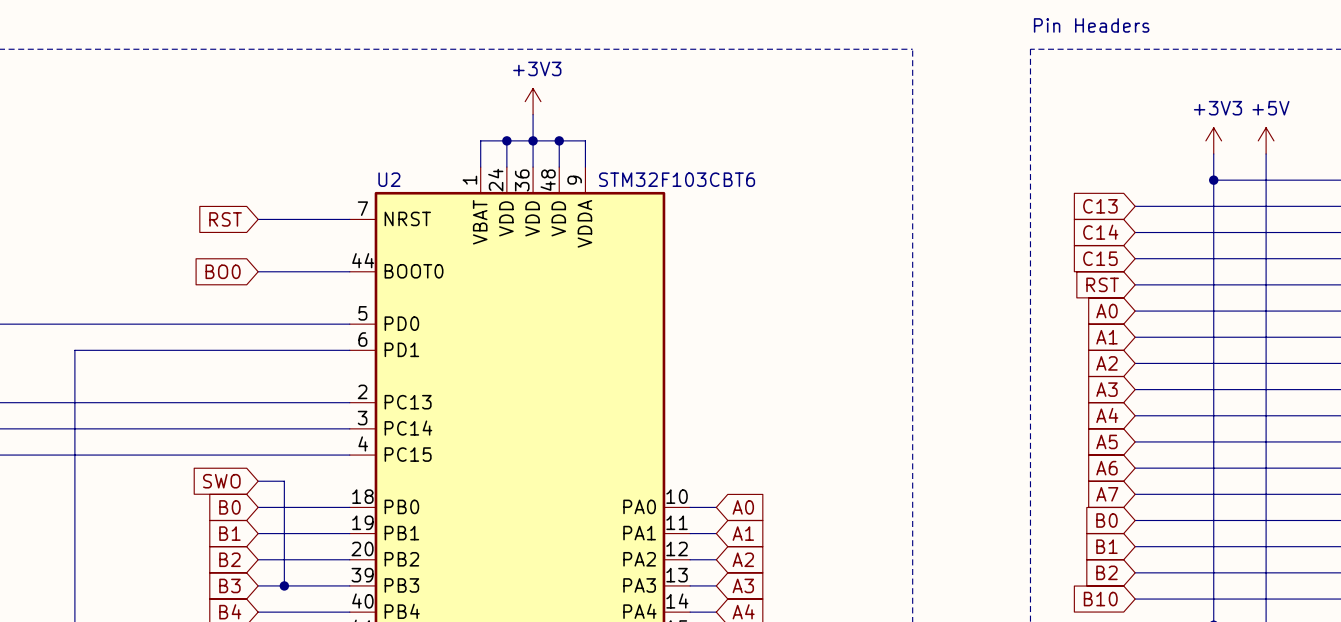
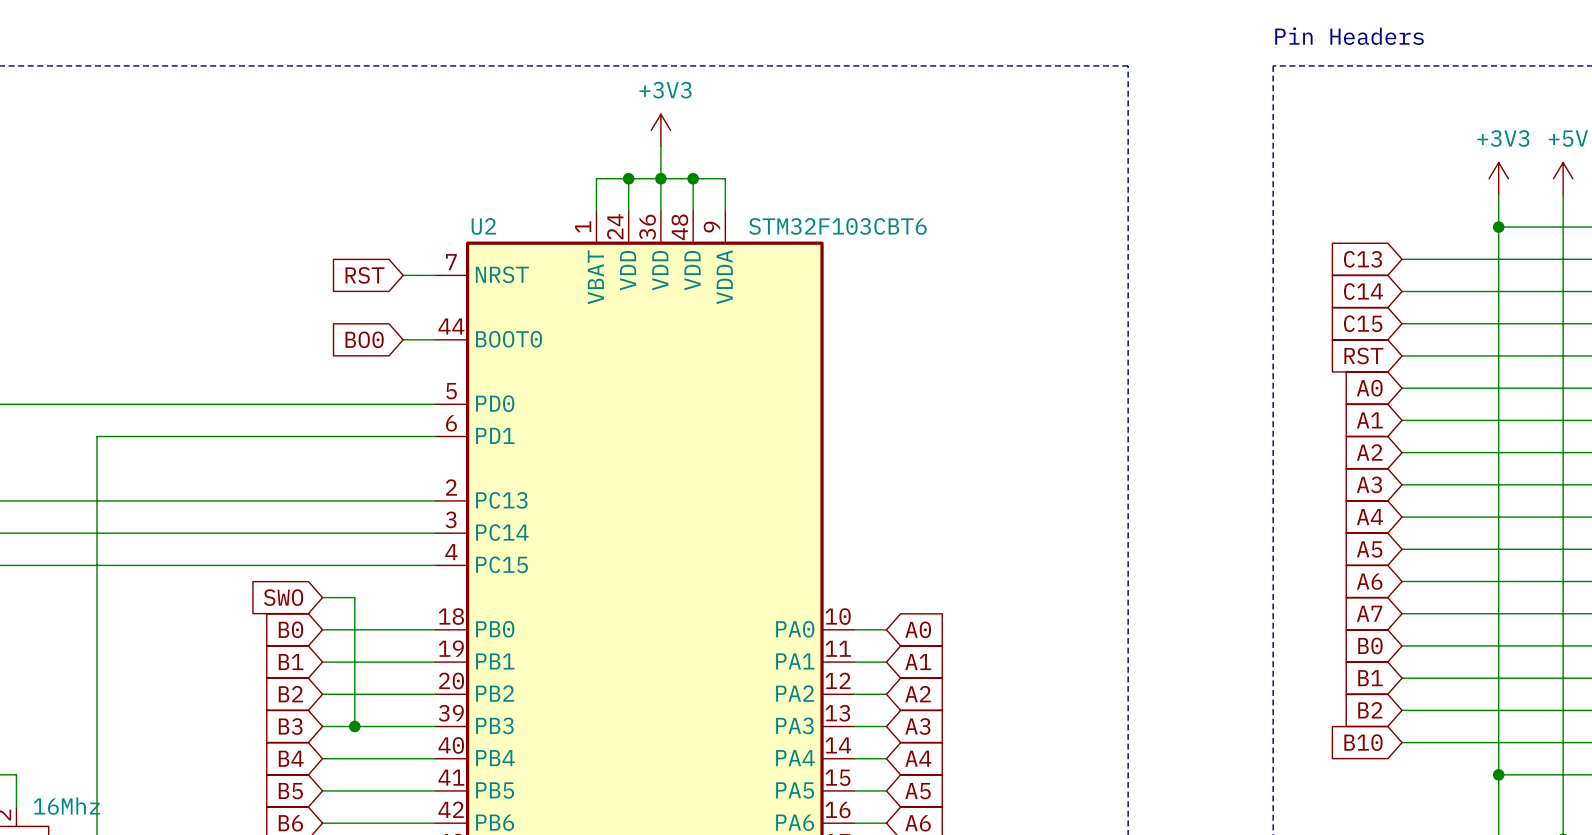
global label position: RST (225, 219) -> RST (364, 275)
wire: (258, 219) (323, 219) -> none
global label position: BO0 (223, 271) -> BO0 (364, 339)
wire: (258, 271) (323, 271) -> none

